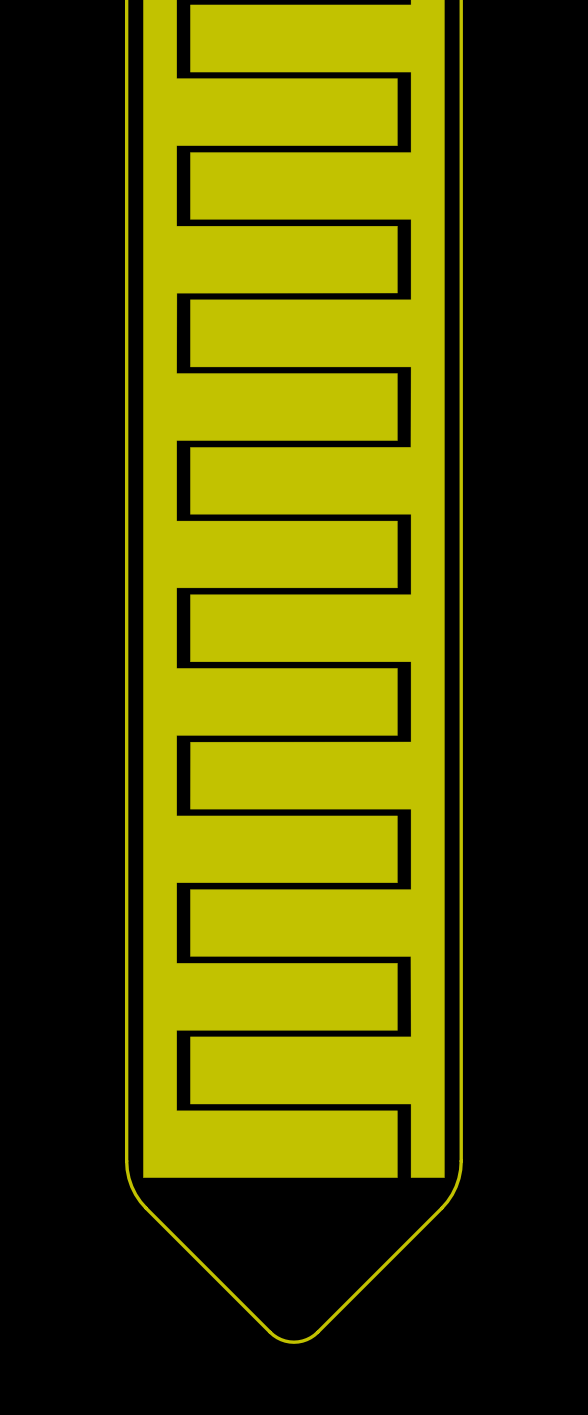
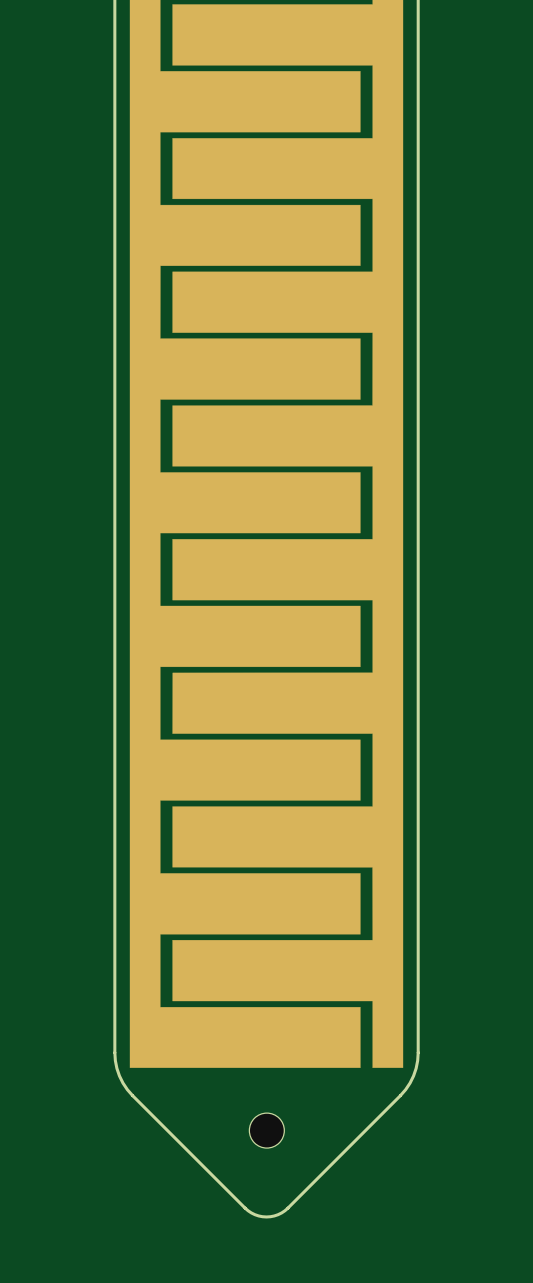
part: none -> (266, 1130)

